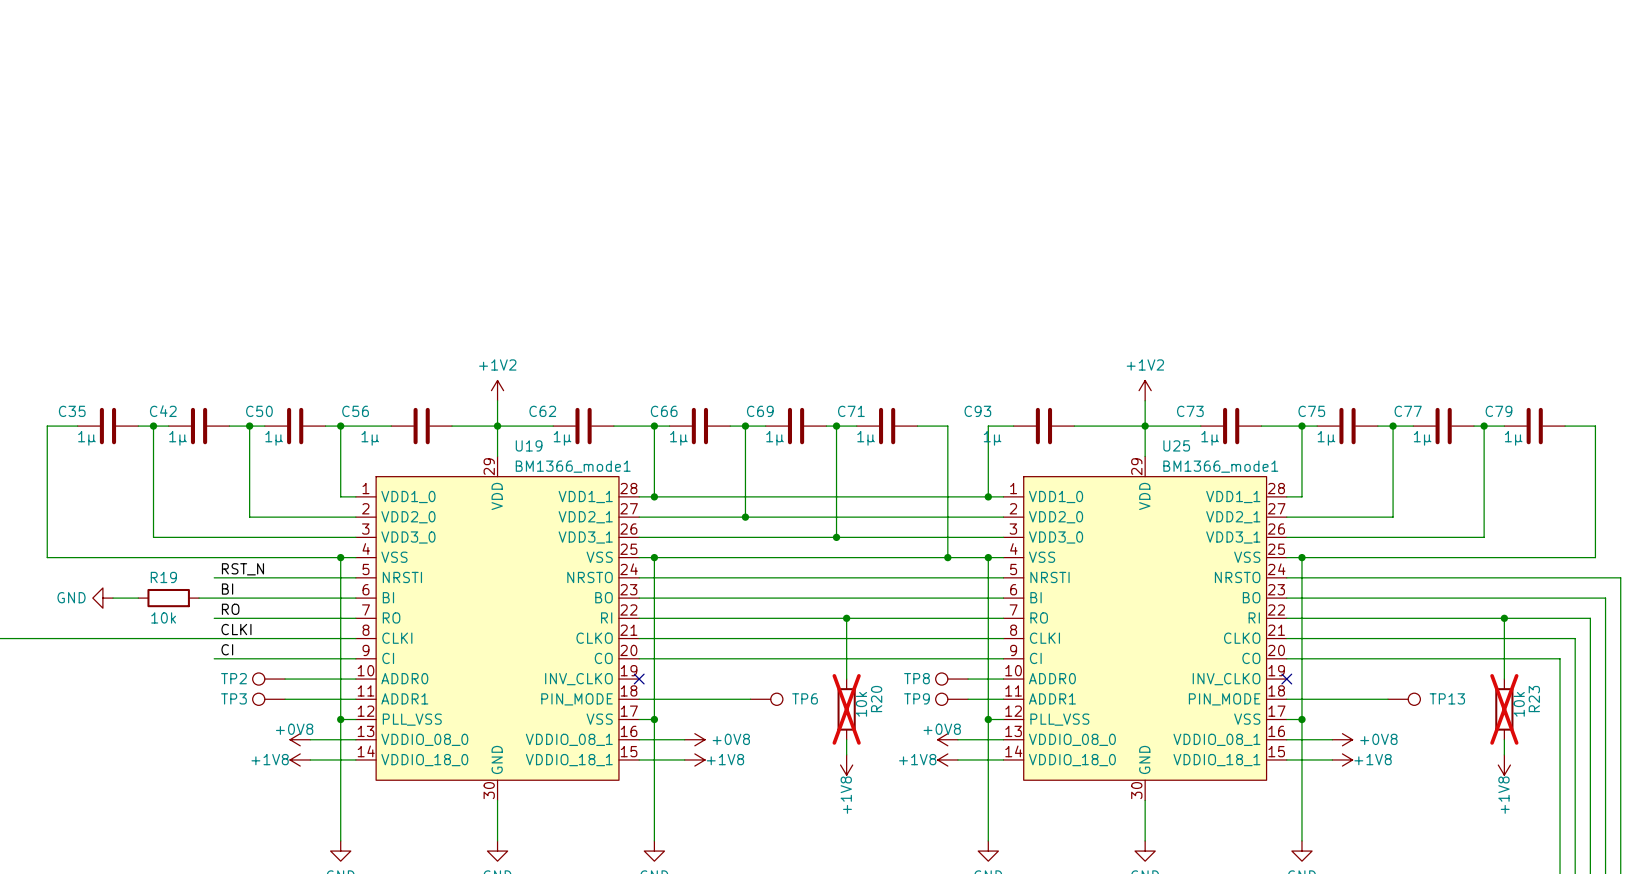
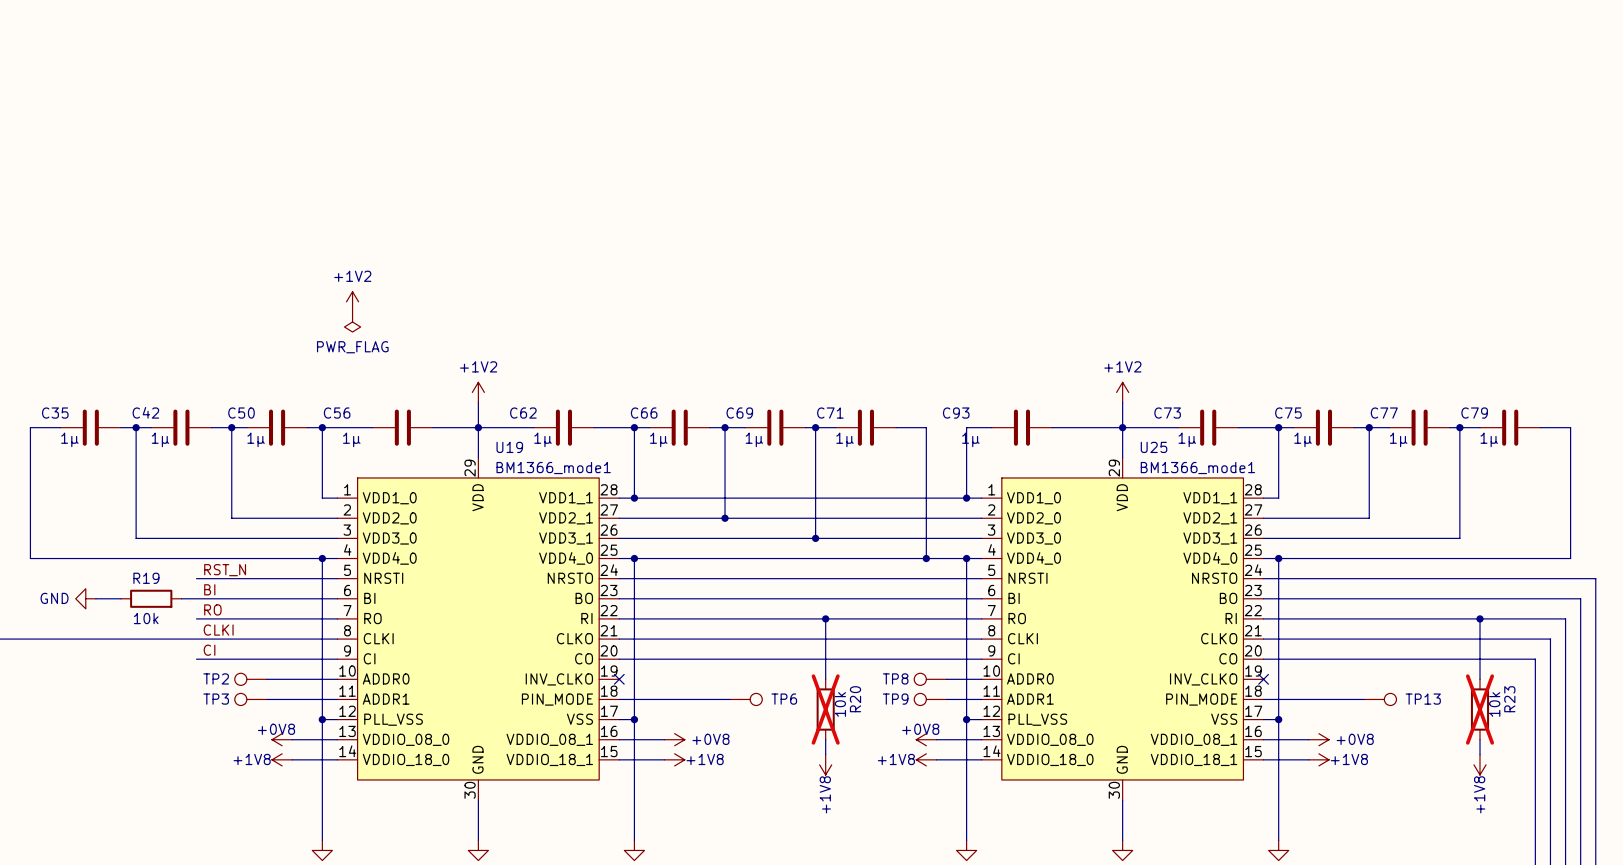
power symbol: none -> +1V2 (352, 301)
power symbol: none -> PWR_FLAG (352, 321)
U19 pin name: VSS (394, 557) -> VDD4_0 (389, 558)
U19 pin name: VSS (599, 557) -> VDD4_0 (566, 558)
U25 pin name: VSS (1042, 557) -> VDD4_0 (1033, 558)
U25 pin name: VSS (1247, 557) -> VDD4_0 (1210, 558)

